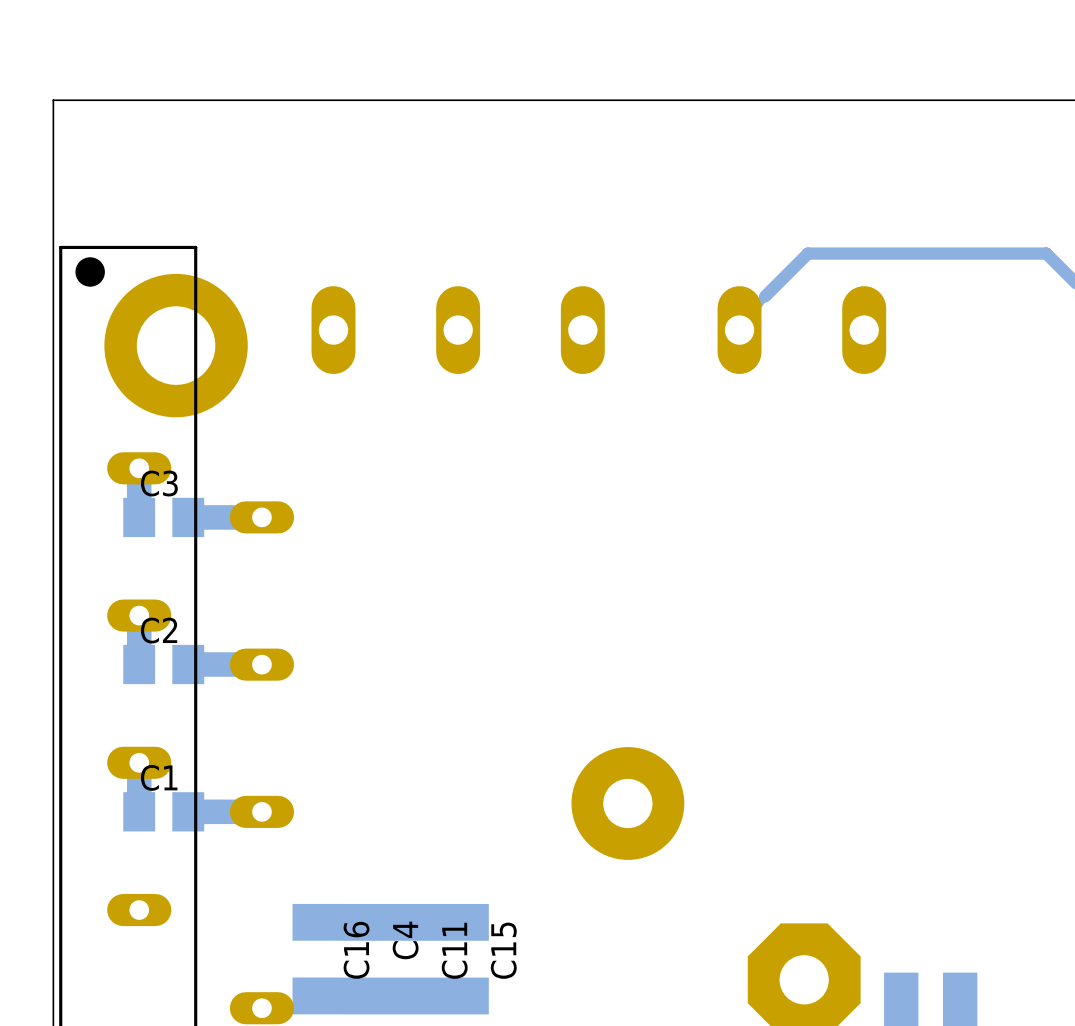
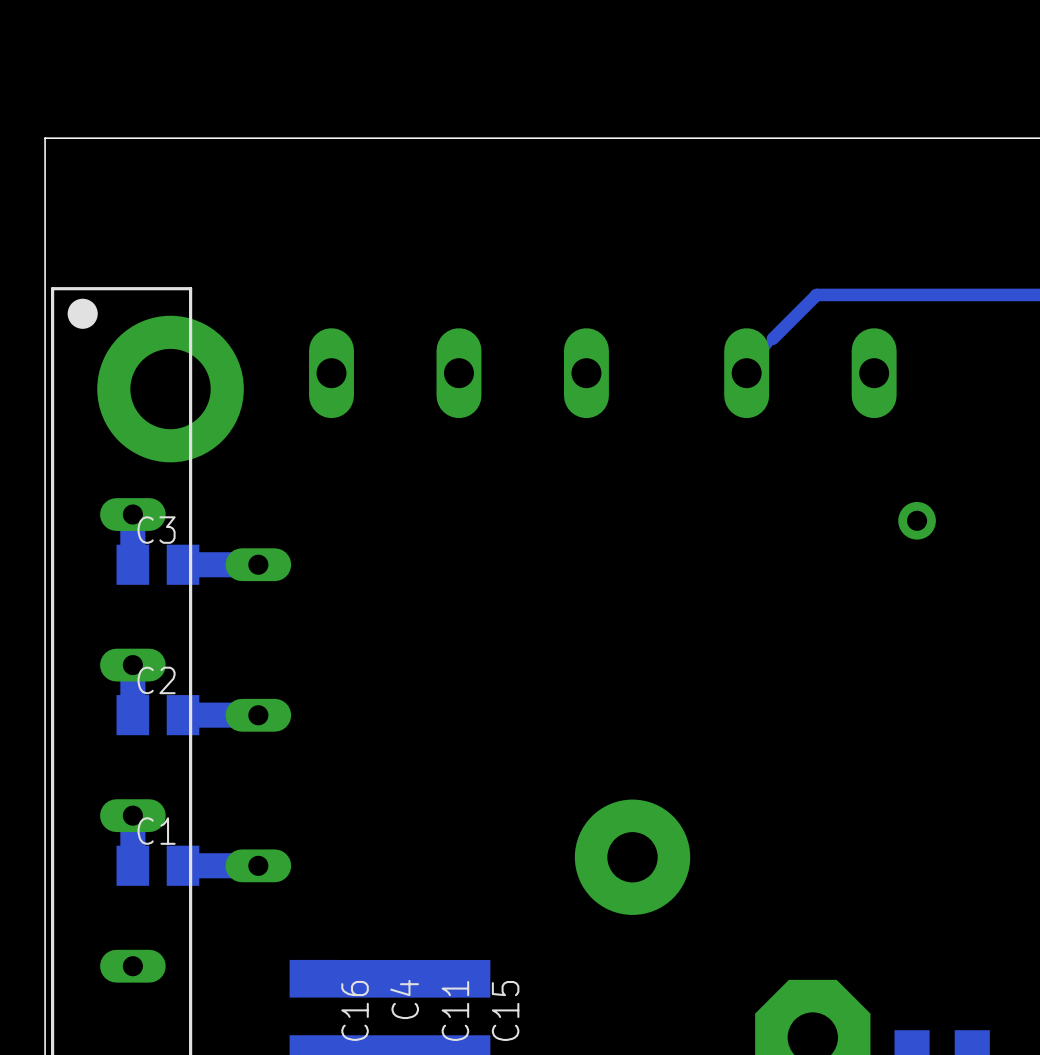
via: none -> (917, 520)

